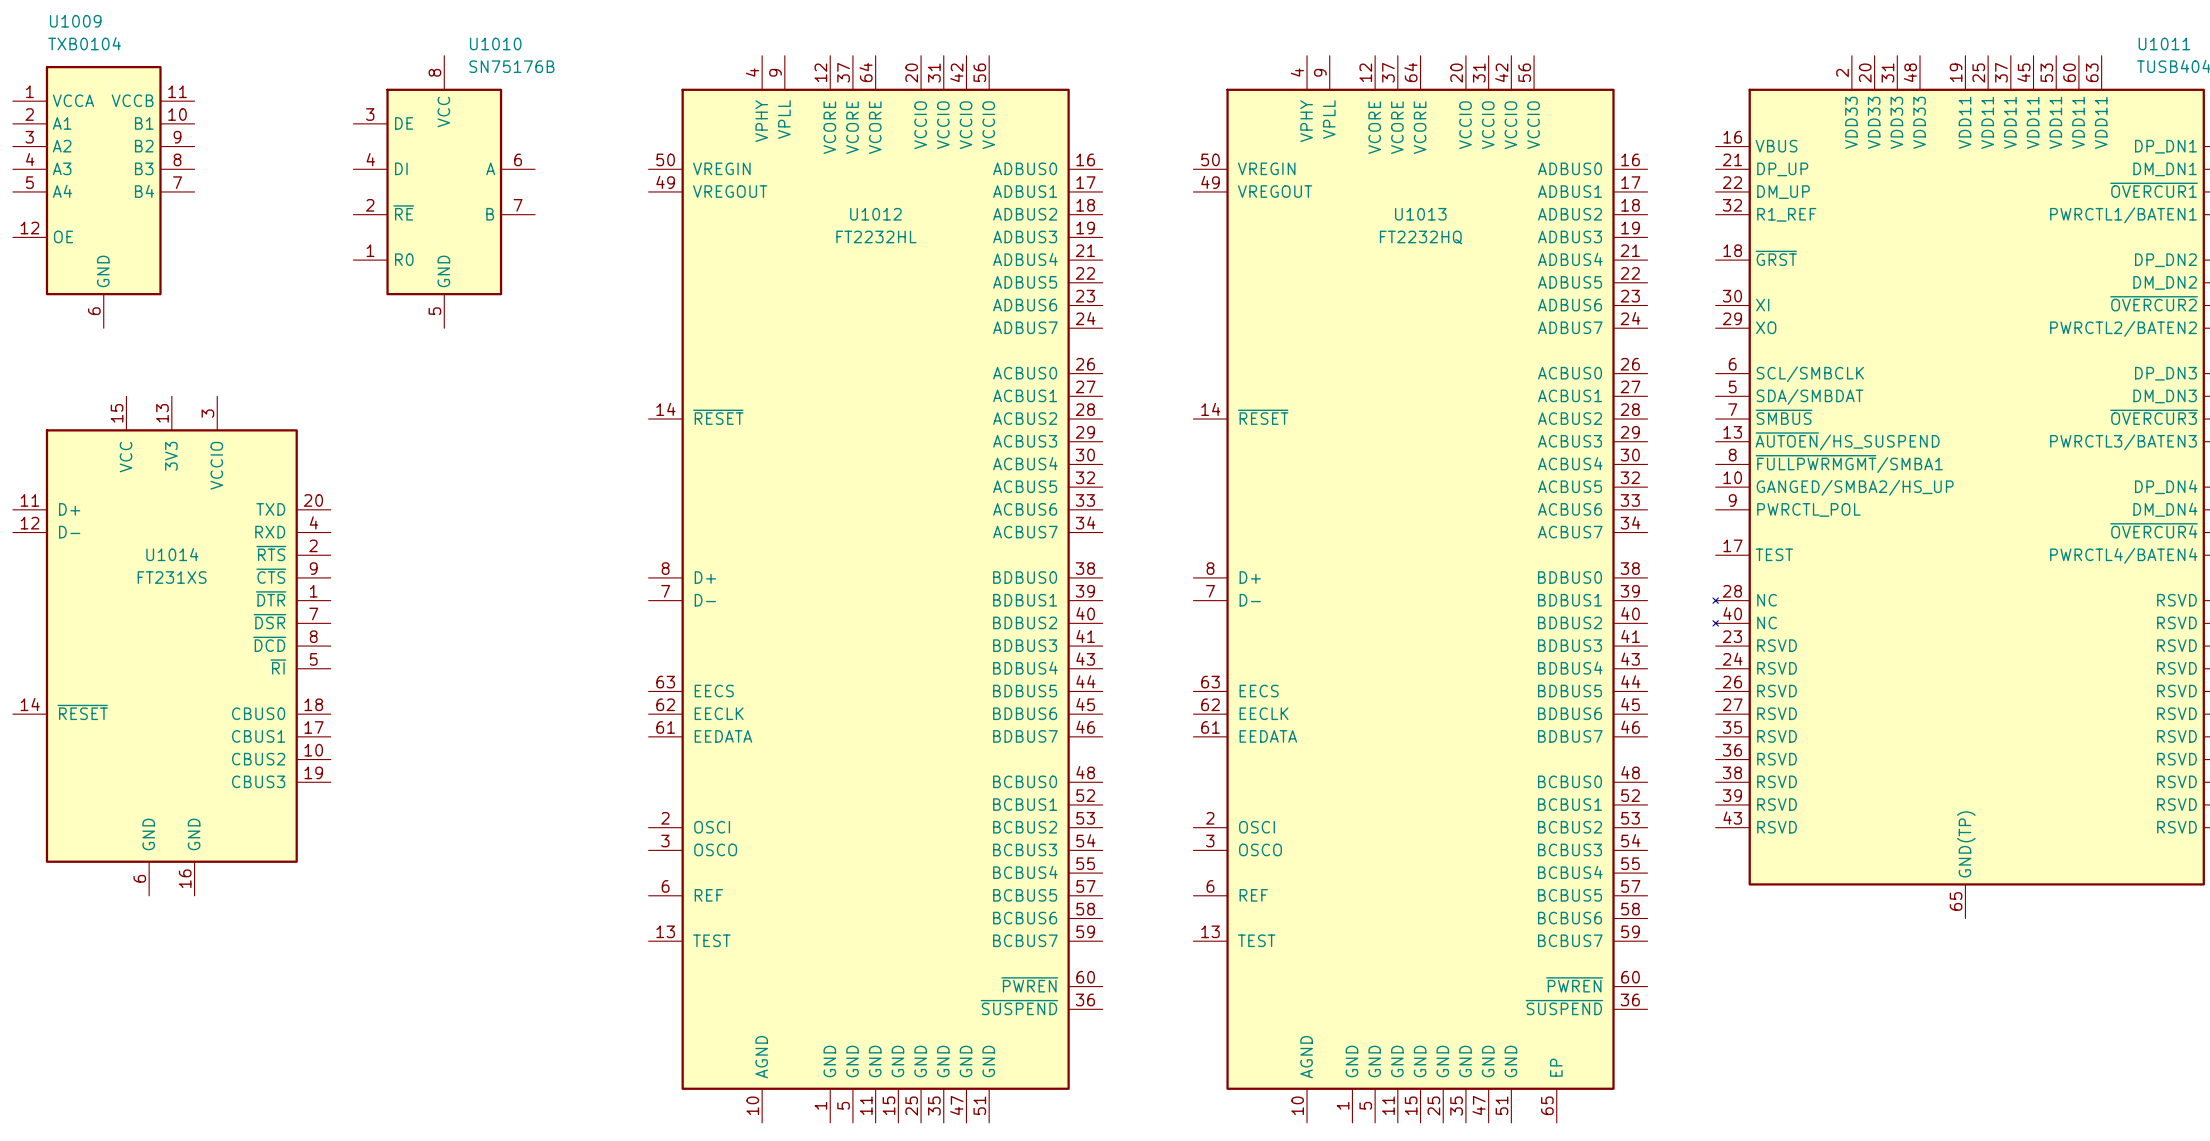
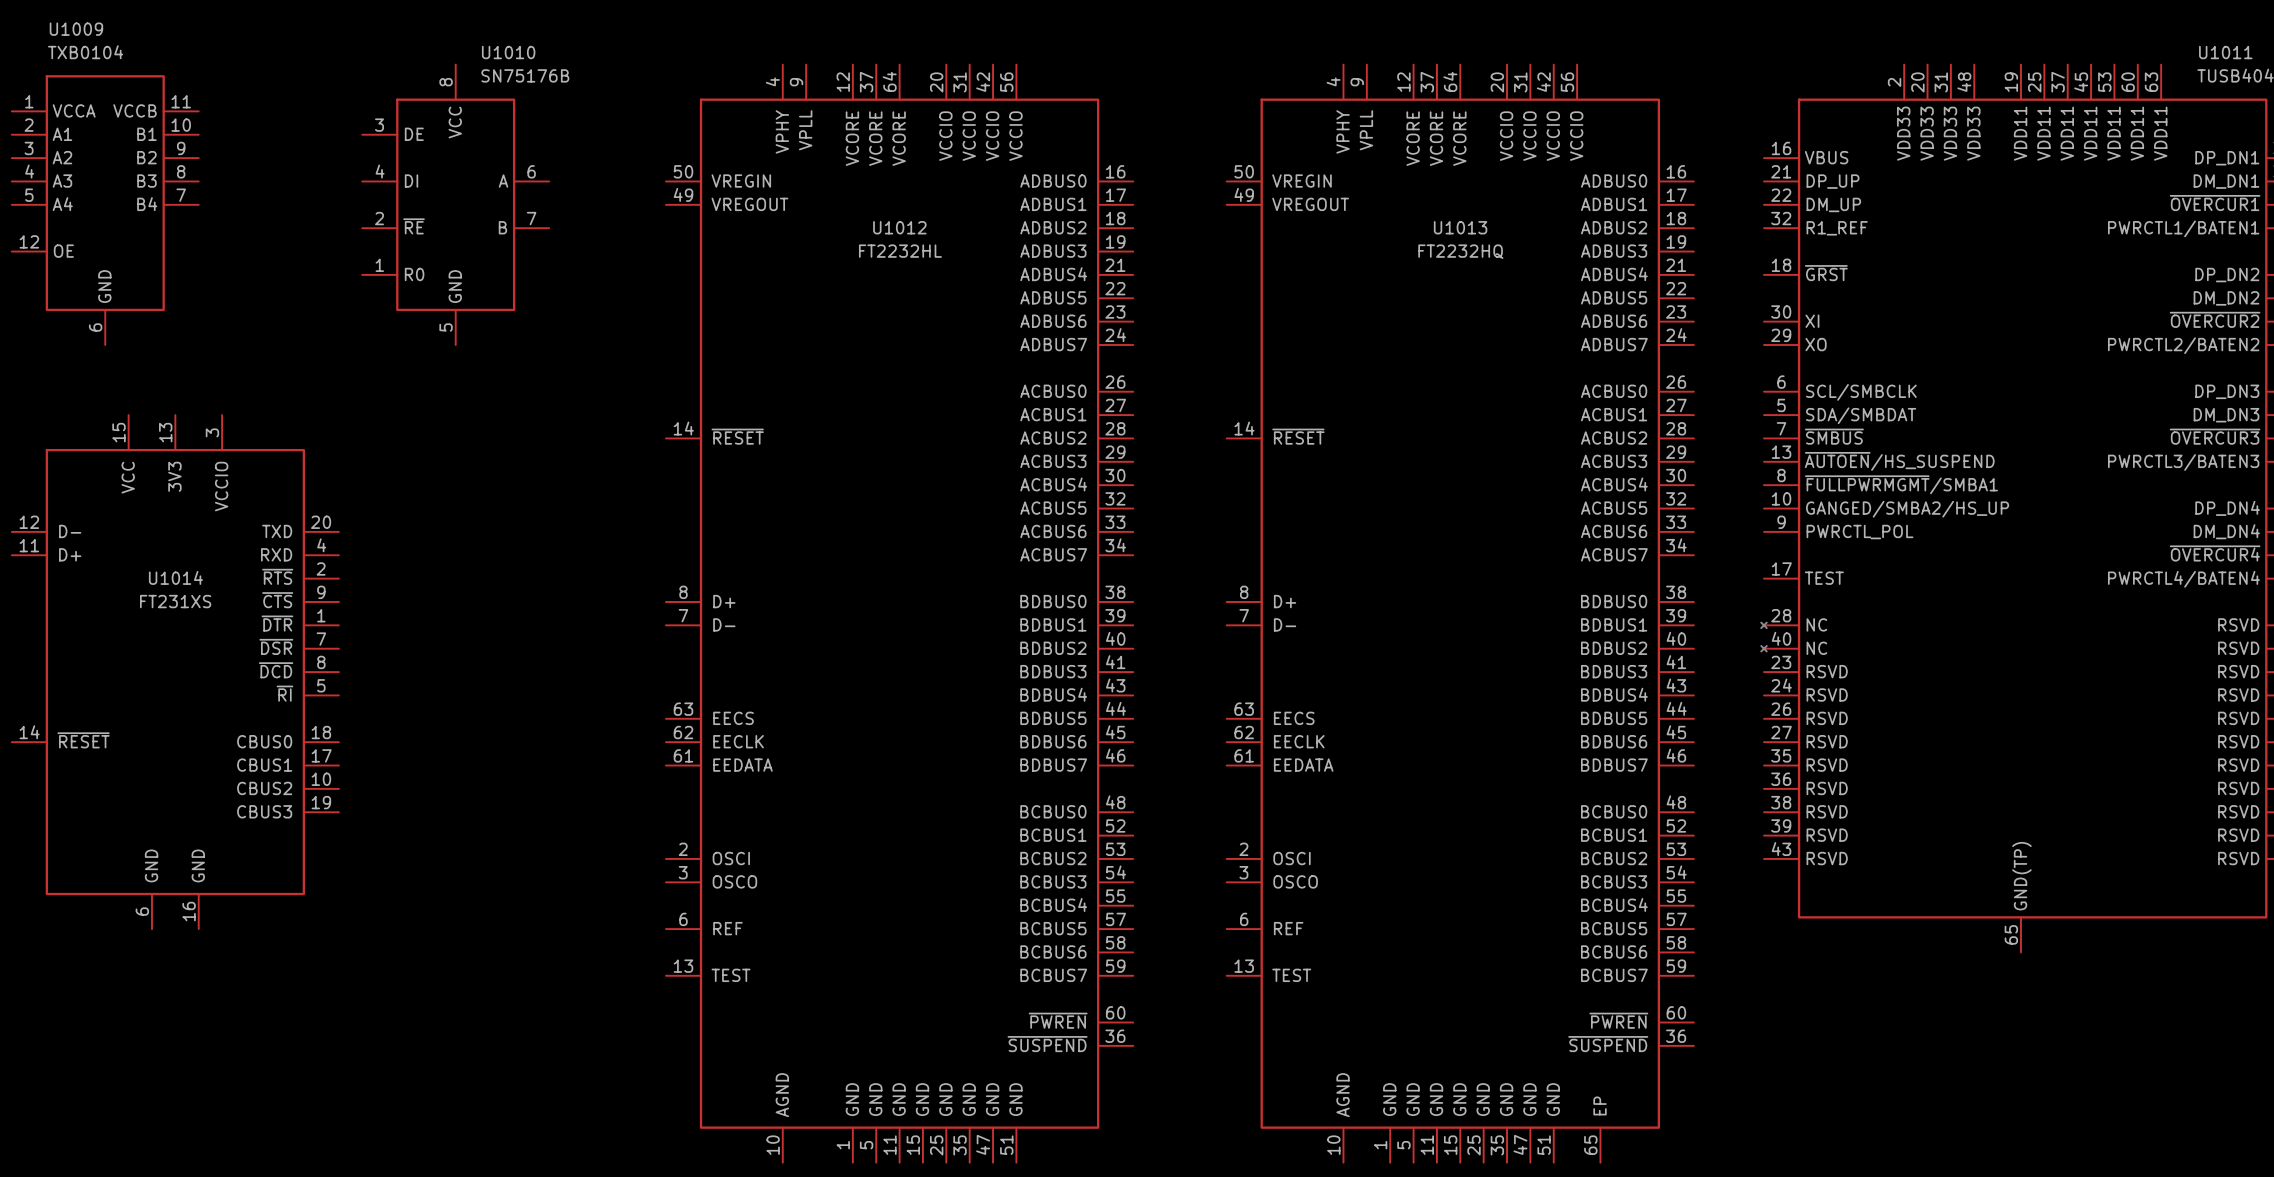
U1014 pin number: 11 (29, 500) -> 12 (29, 522)
U1014 pin name: D+ (69, 509) -> D- (70, 531)
U1014 pin number: 12 (29, 523) -> 11 (29, 545)
U1014 pin name: D- (69, 532) -> D+ (70, 554)

